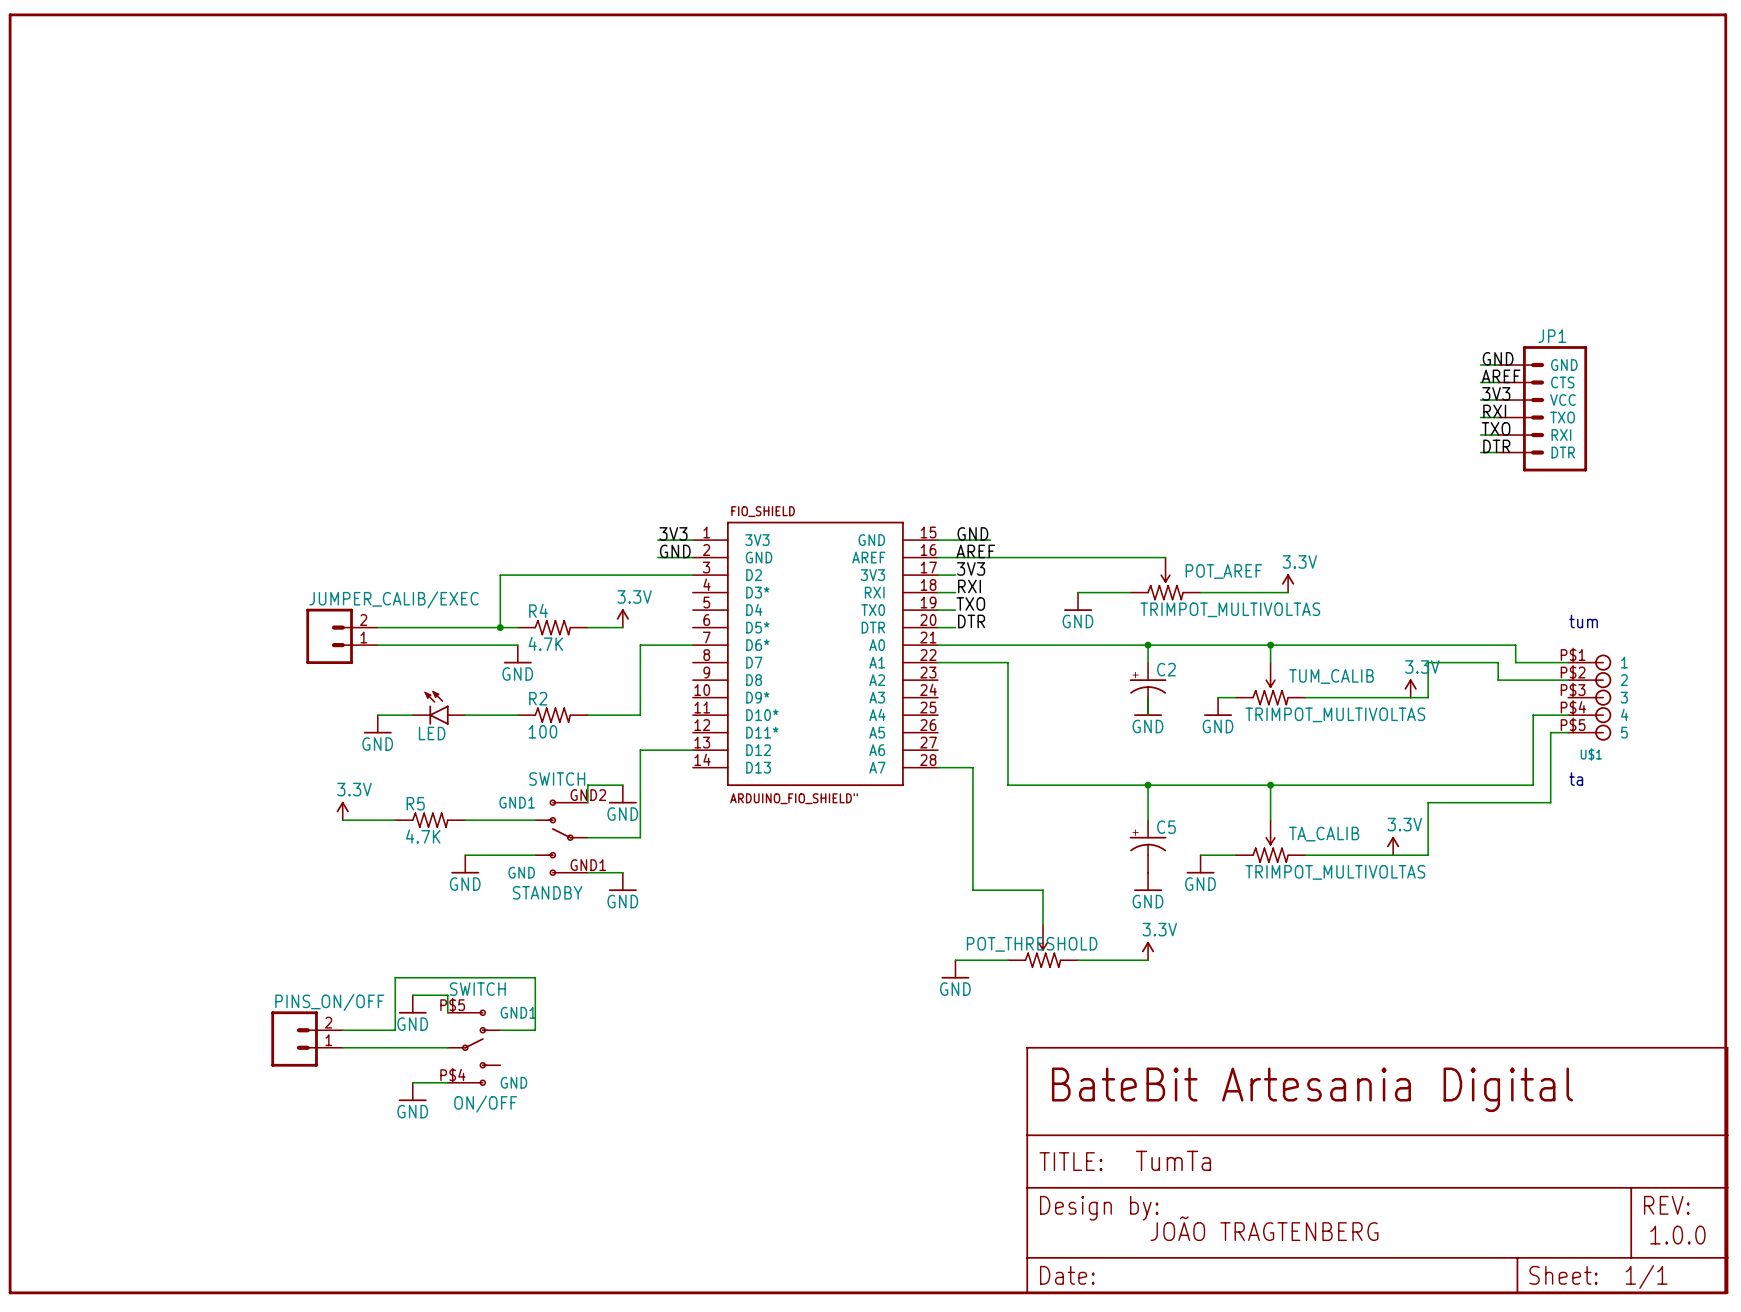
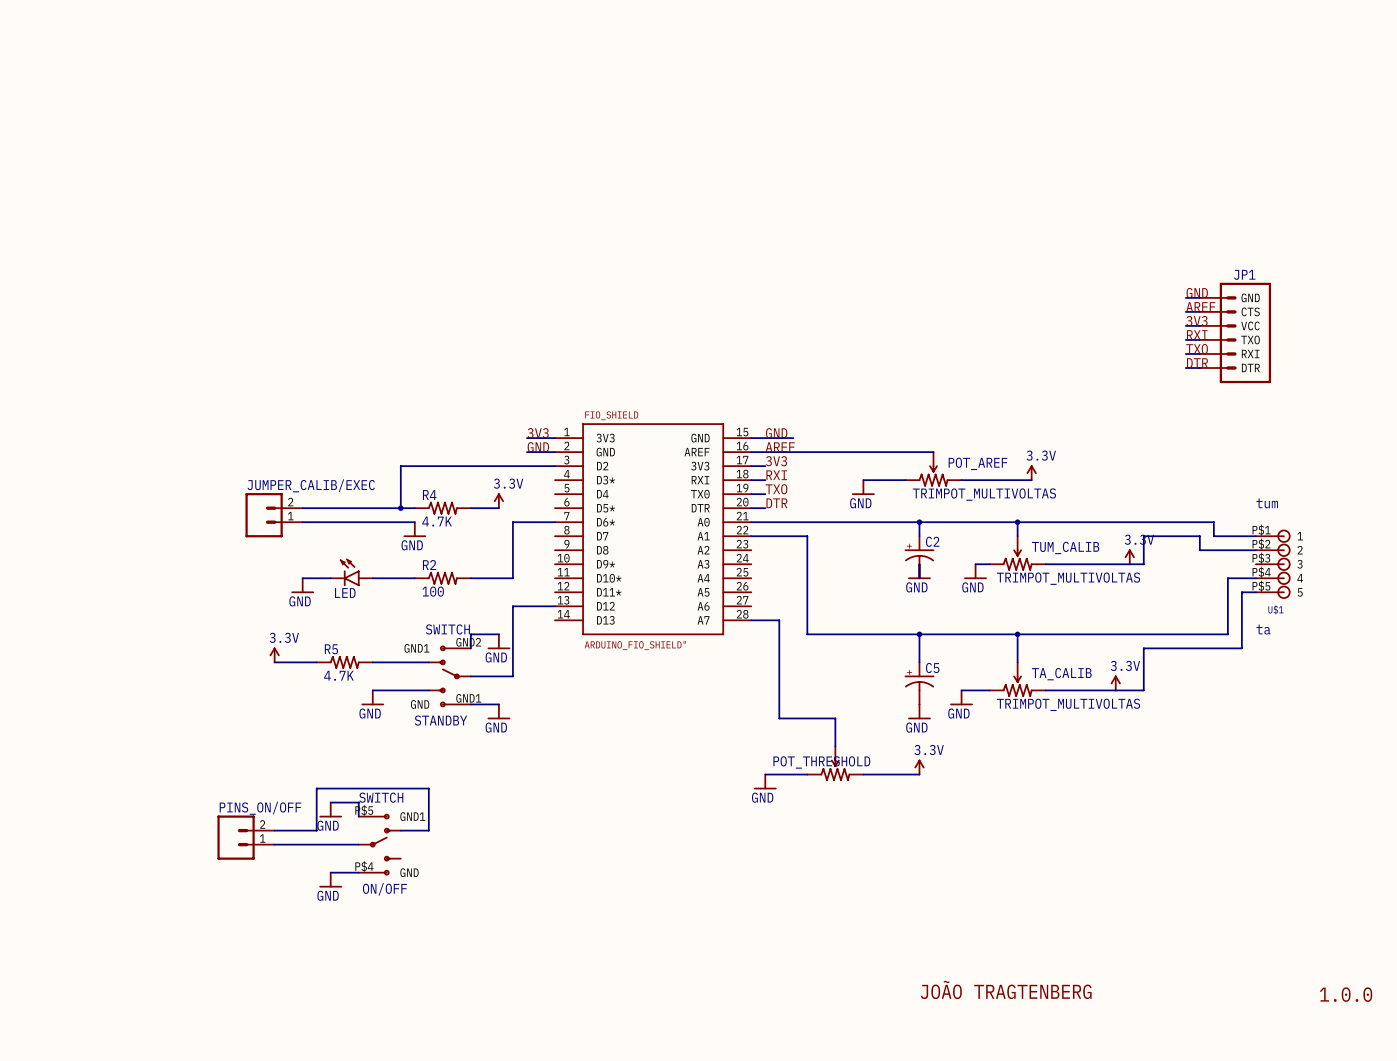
part: (867, 653) -> none
part: (1377, 1170) -> none

